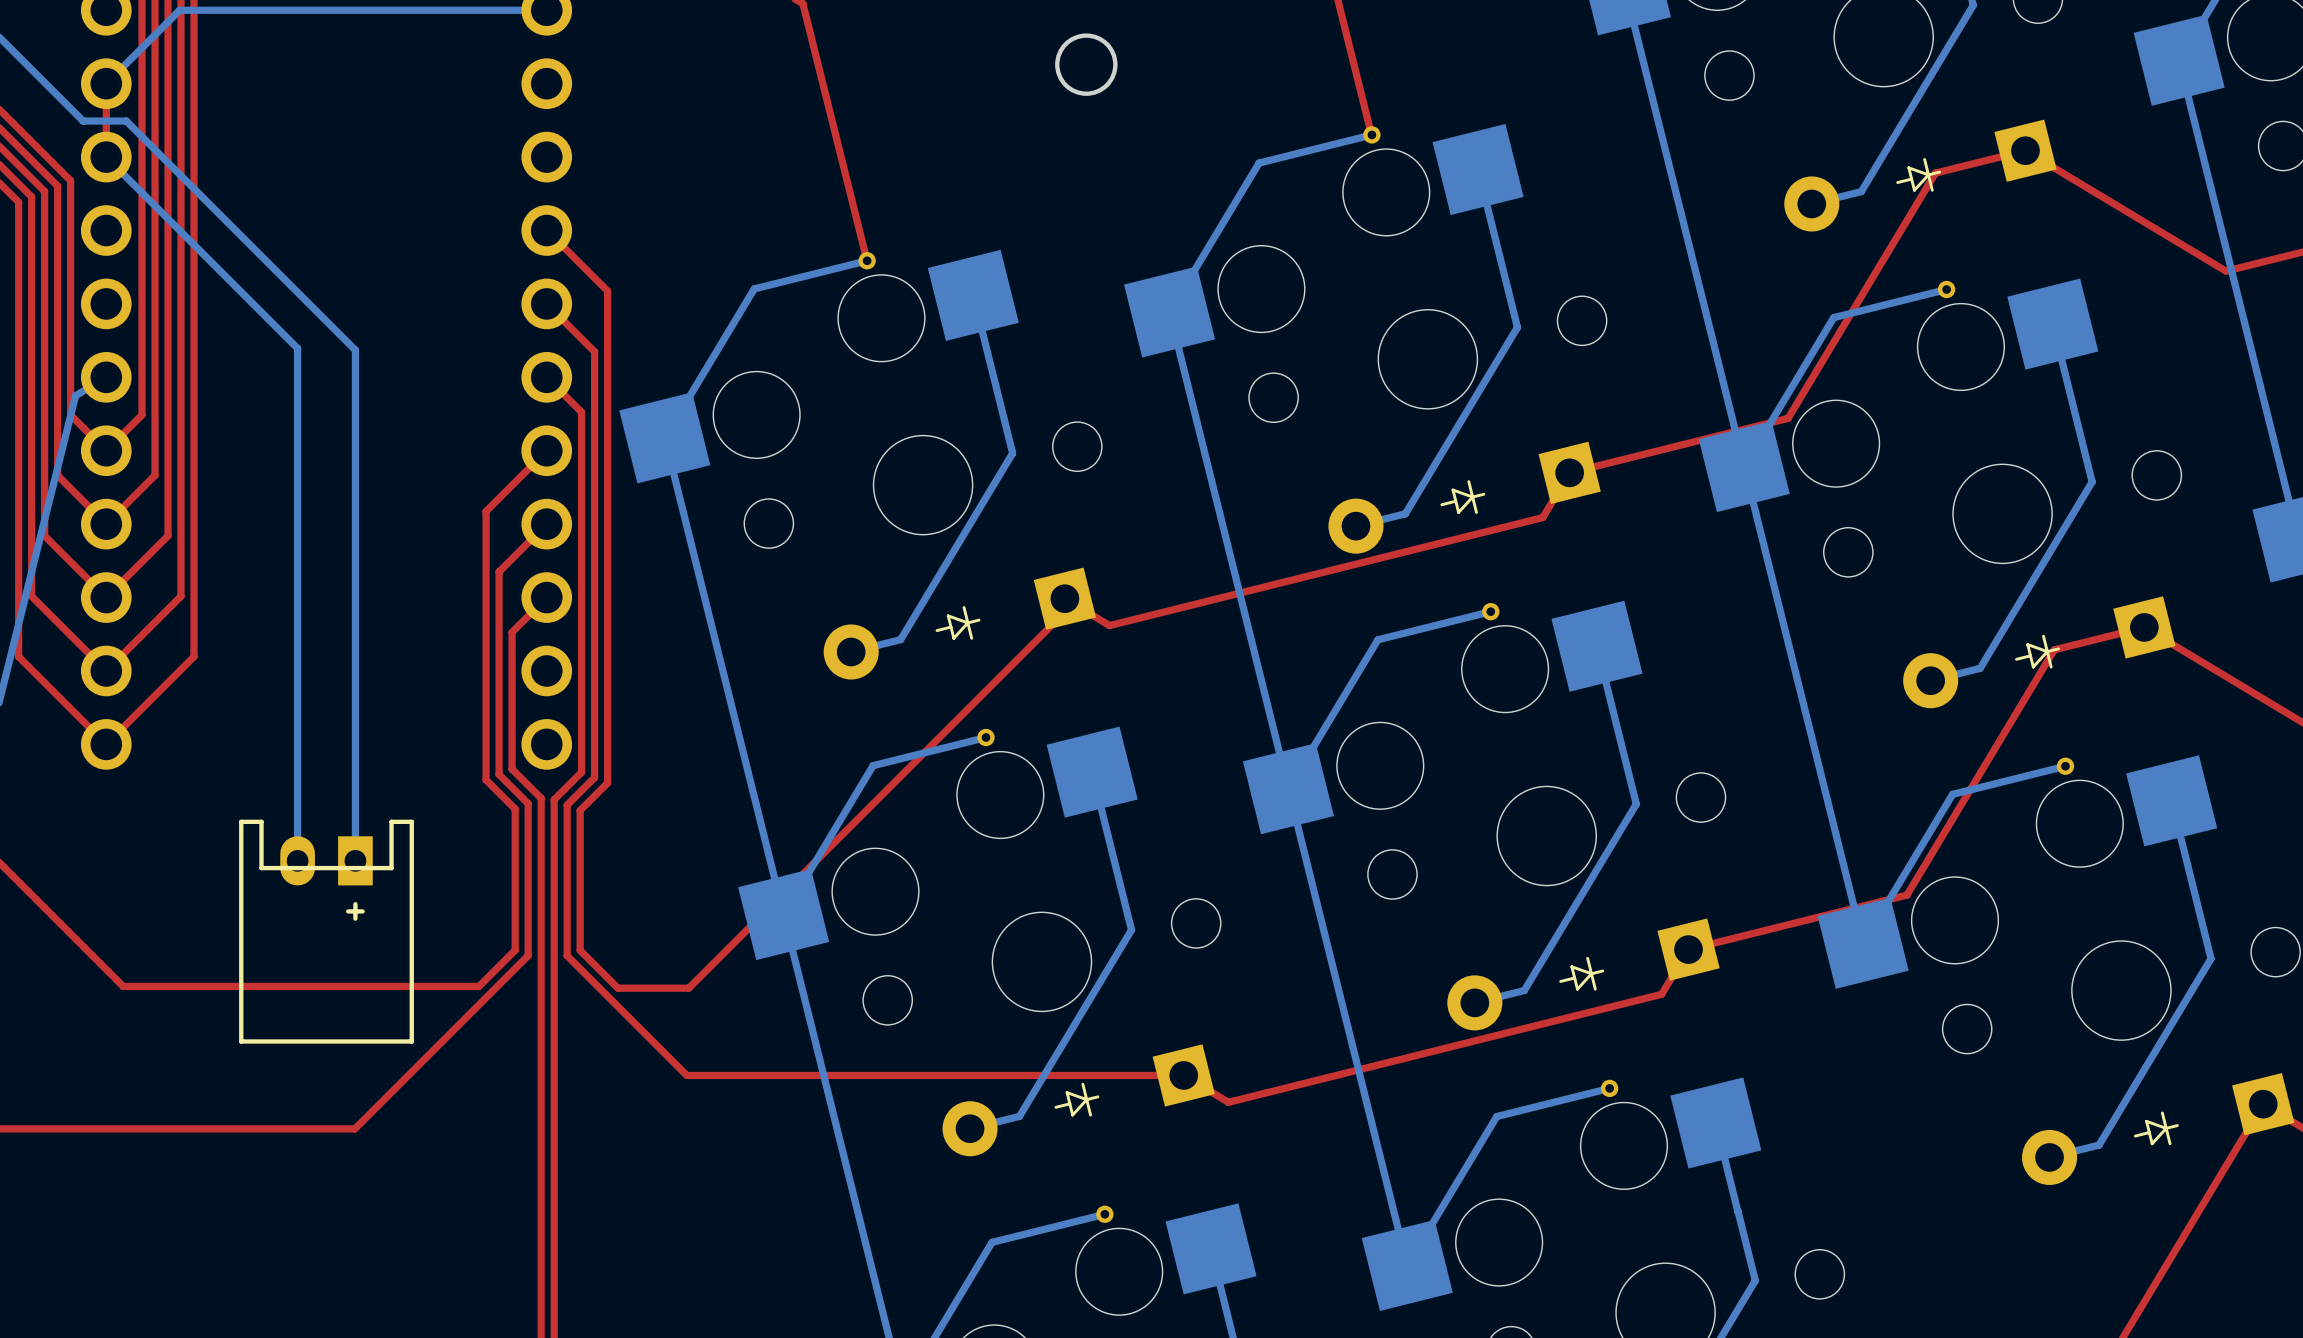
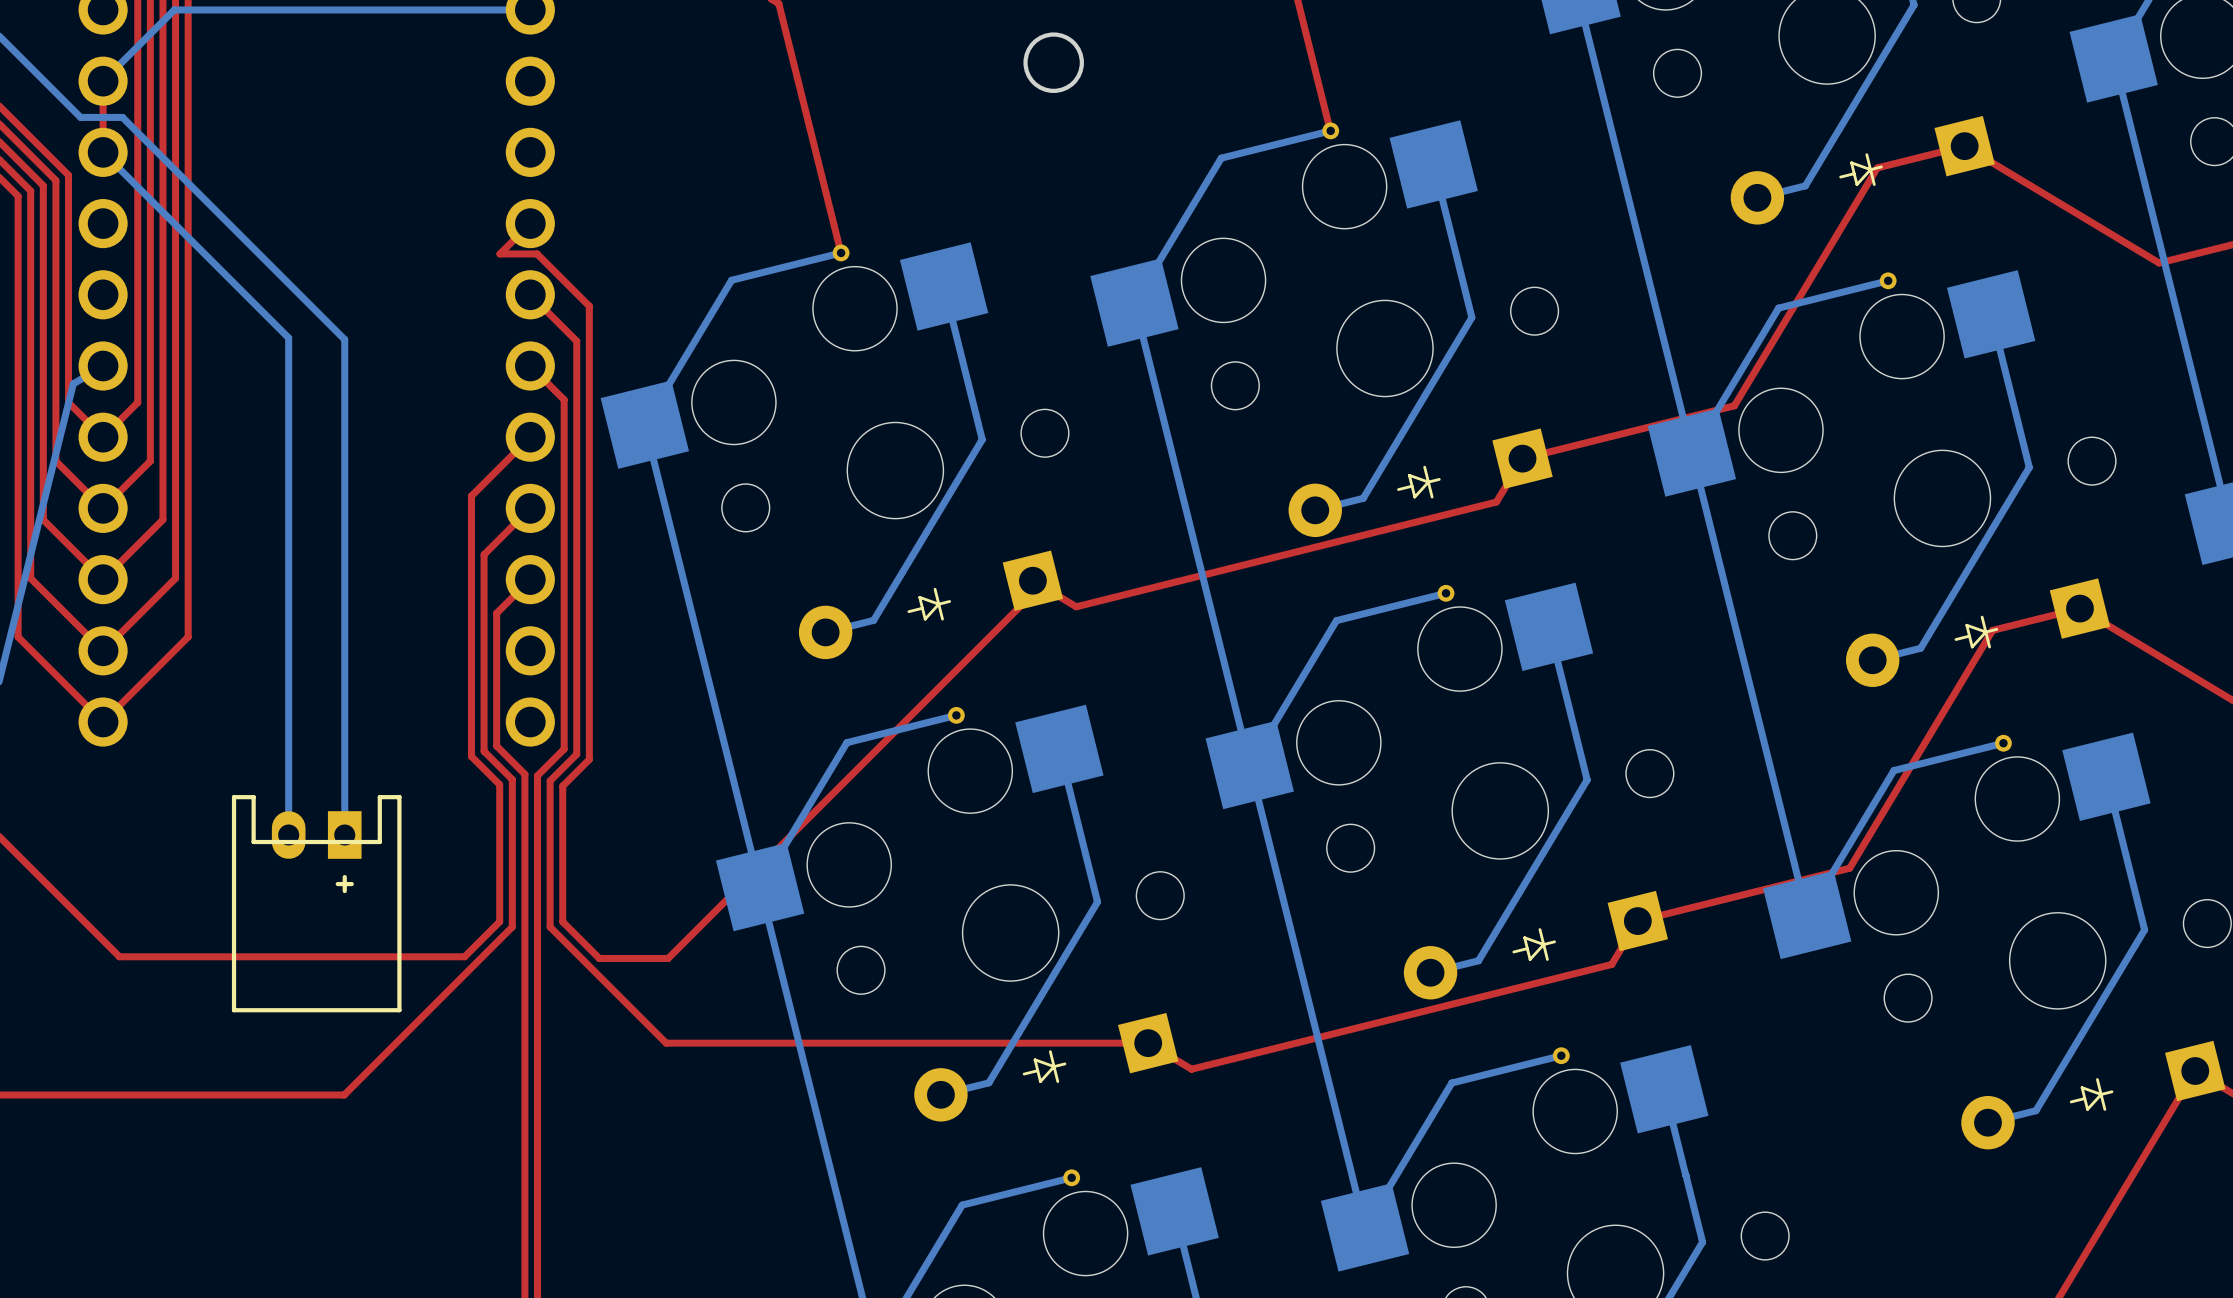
top track: (547, 230) (607, 291) (607, 315) -> (530, 223) (499, 253) (537, 253) (589, 306)

